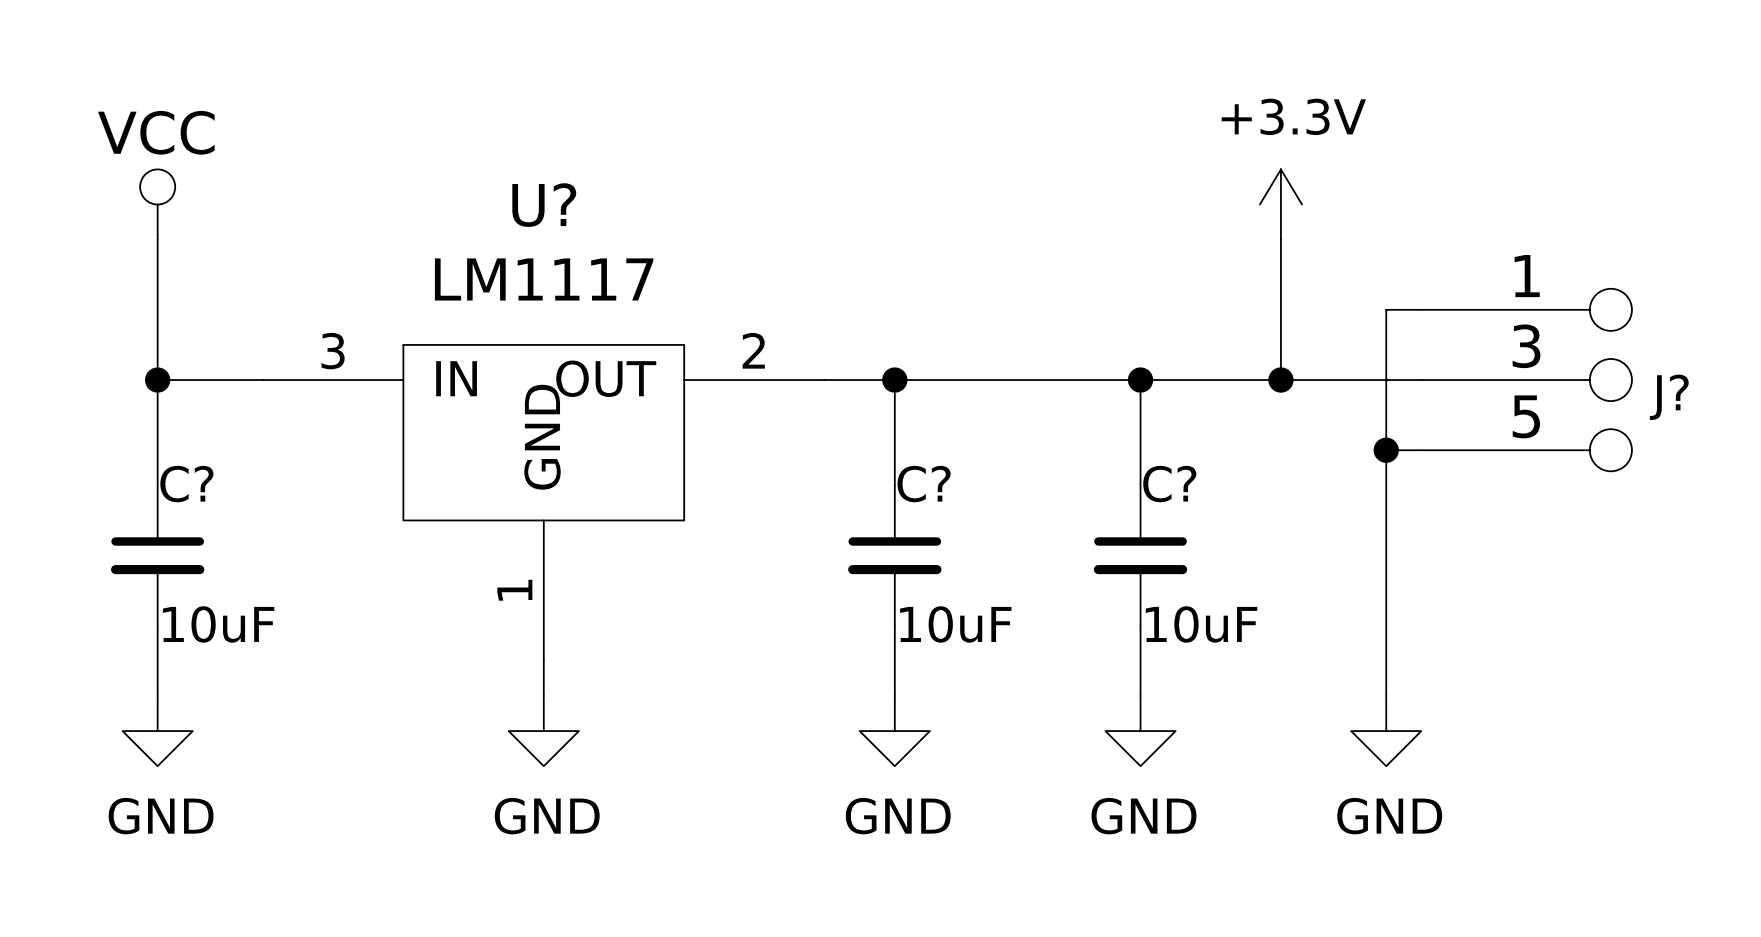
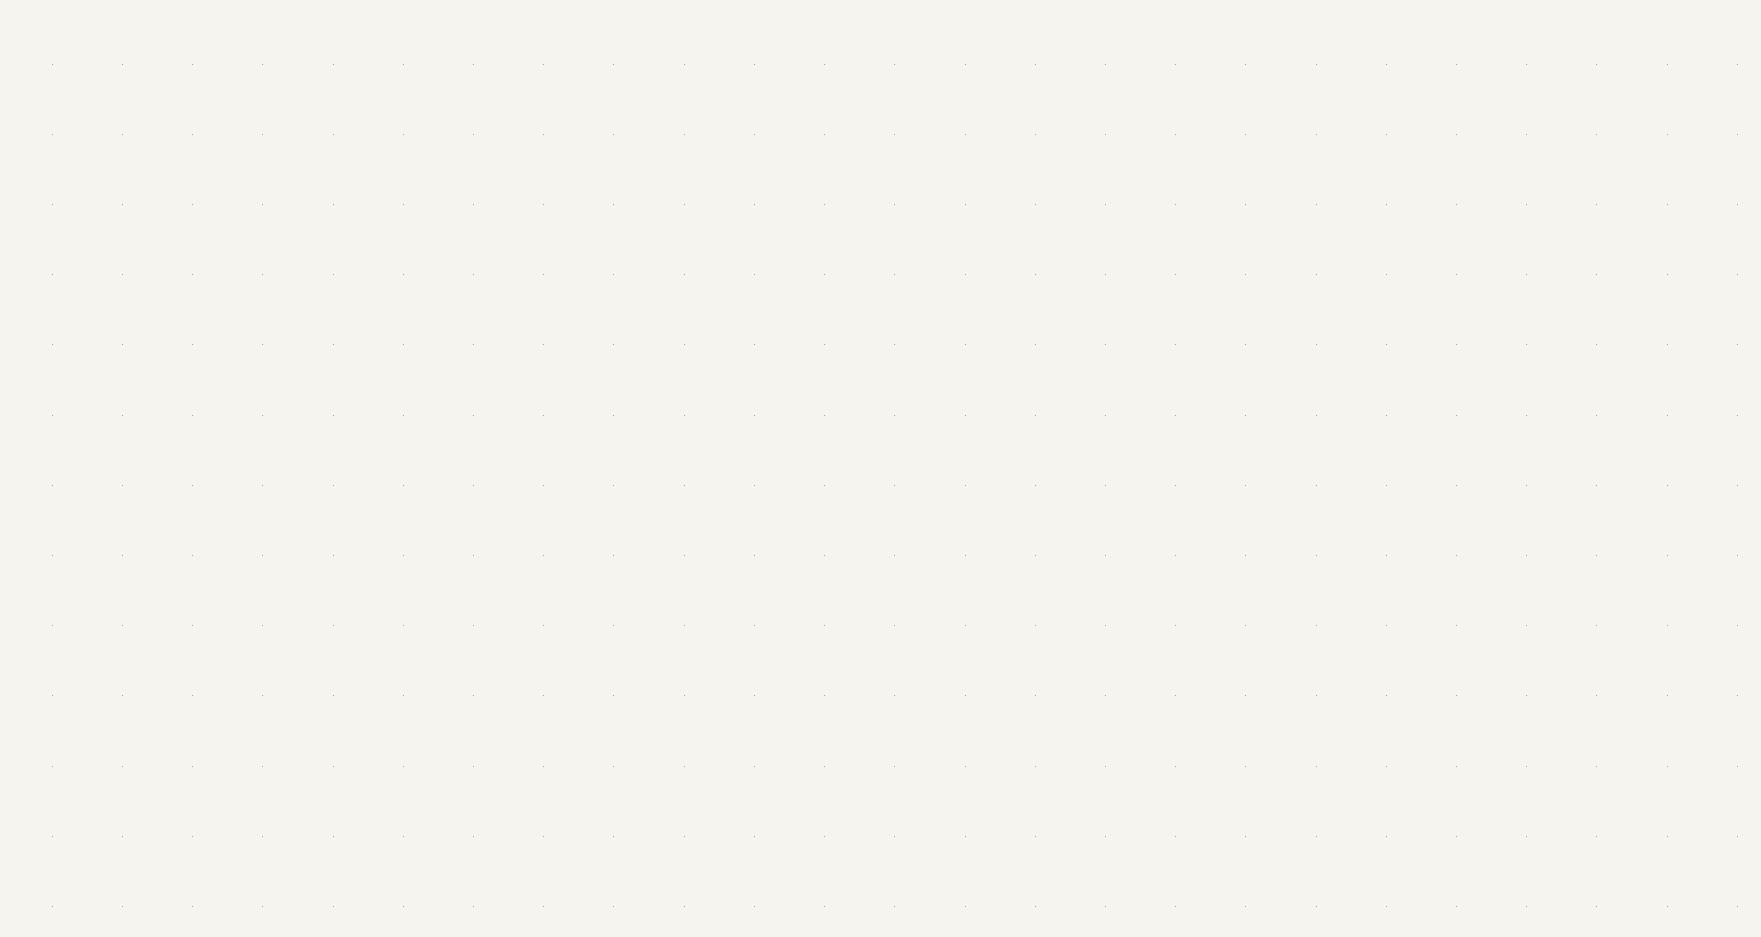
power symbol: VCC (157, 204) -> none
power symbol: +3.3V (1280, 204) -> none
wire: (157, 239) (157, 485) -> none
wire: (1280, 239) (1280, 380) -> none
wire: (1421, 309) (1386, 309) (1386, 695) -> none
wire: (157, 380) (262, 380) -> none
junction: (157, 380) -> none
wire: (824, 380) (1421, 380) -> none
wire: (894, 380) (894, 485) -> none
junction: (894, 380) -> none
wire: (1140, 380) (1140, 485) -> none
junction: (1140, 380) -> none
junction: (1280, 380) -> none
J?: (1526, 380) -> none
wire: (1386, 450) (1421, 450) -> none
junction: (1386, 450) -> none
U?: LM1117 (543, 502) -> none
C?: 10uF (157, 555) -> none
C?: 10uF (894, 555) -> none
C?: 10uF (1140, 555) -> none
wire: (157, 625) (157, 695) -> none
wire: (894, 625) (894, 695) -> none
wire: (1140, 625) (1140, 695) -> none
wire: (543, 660) (543, 695) -> none
power symbol: GND (157, 731) -> none
power symbol: GND (543, 731) -> none
power symbol: GND (894, 731) -> none
power symbol: GND (1140, 731) -> none
power symbol: GND (1386, 731) -> none

